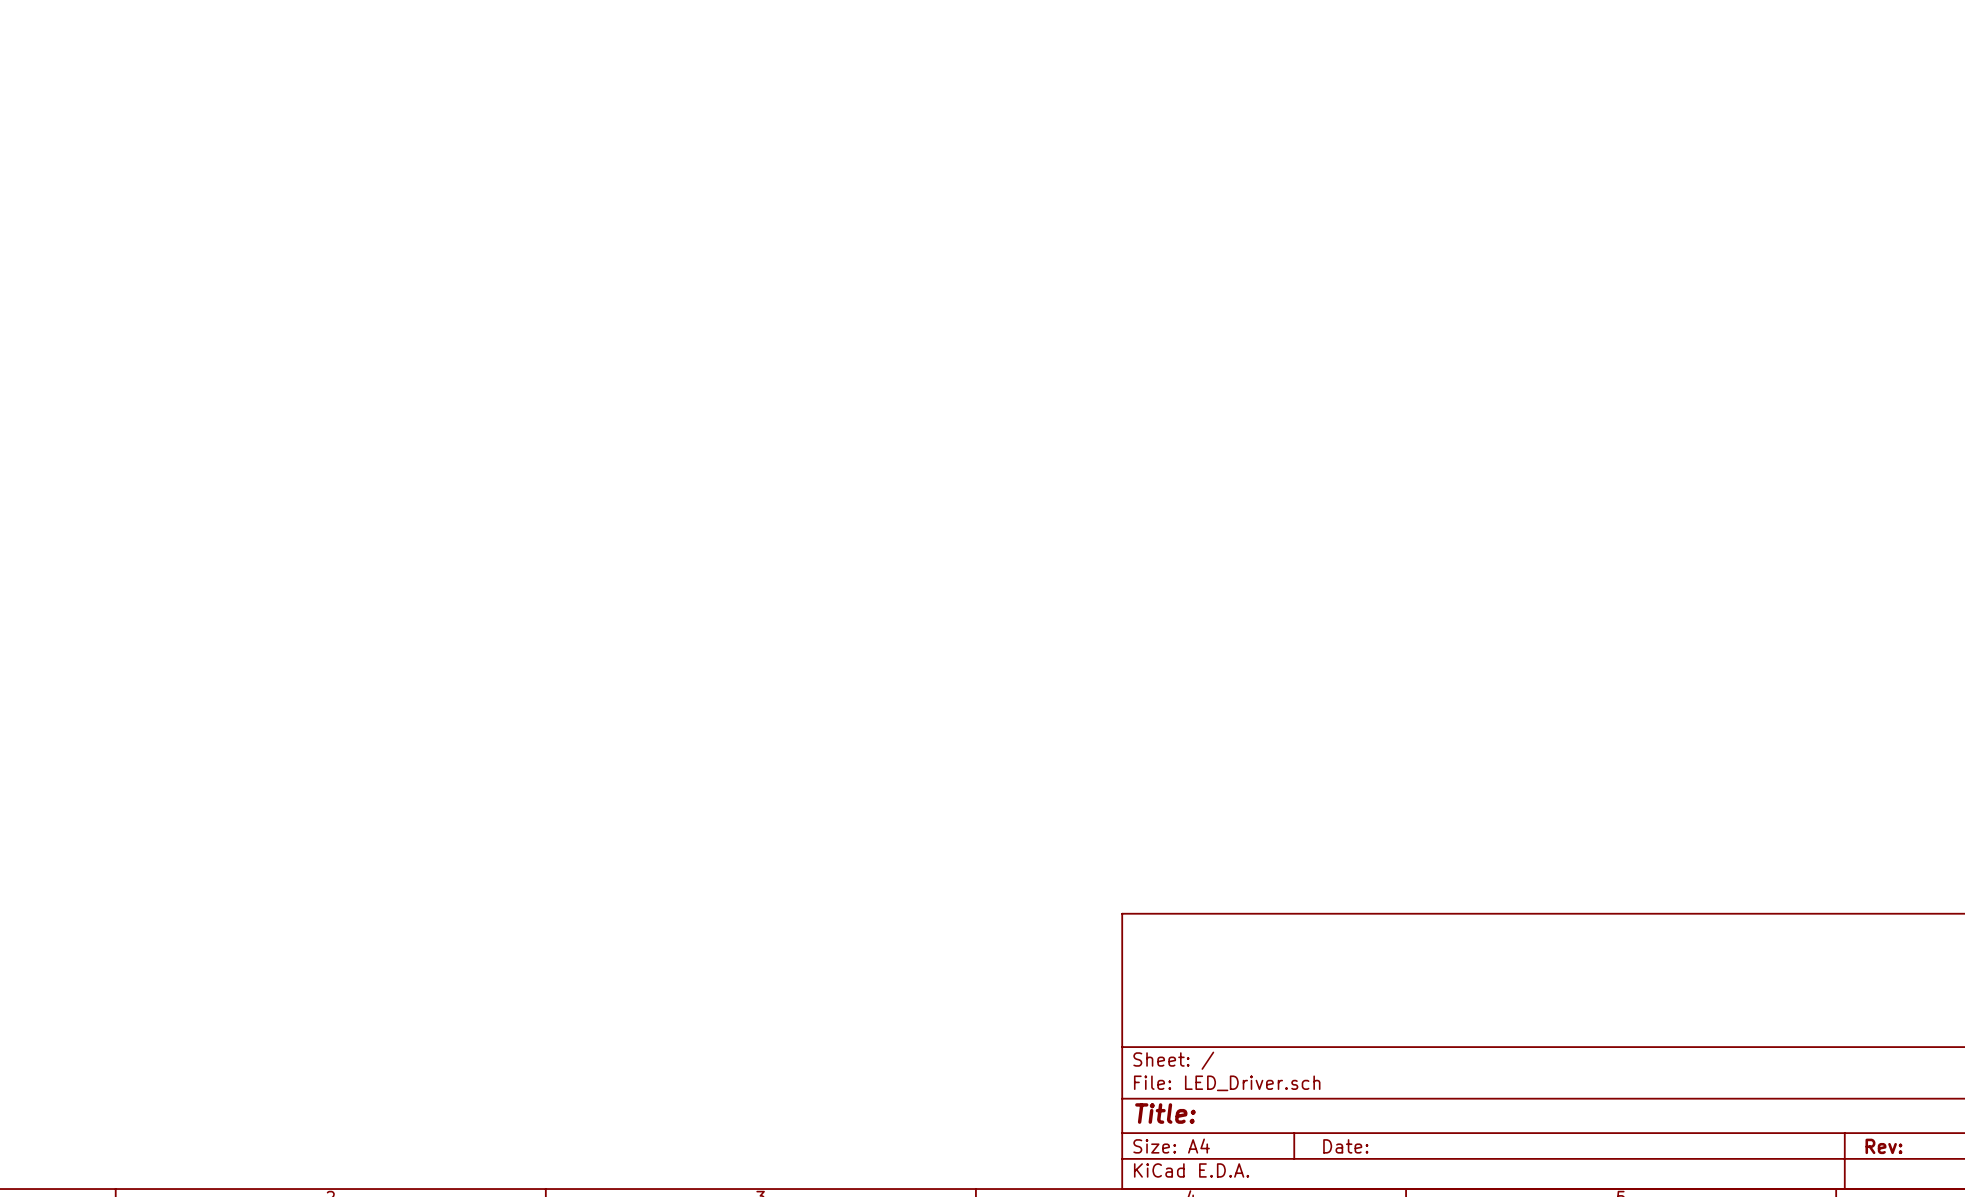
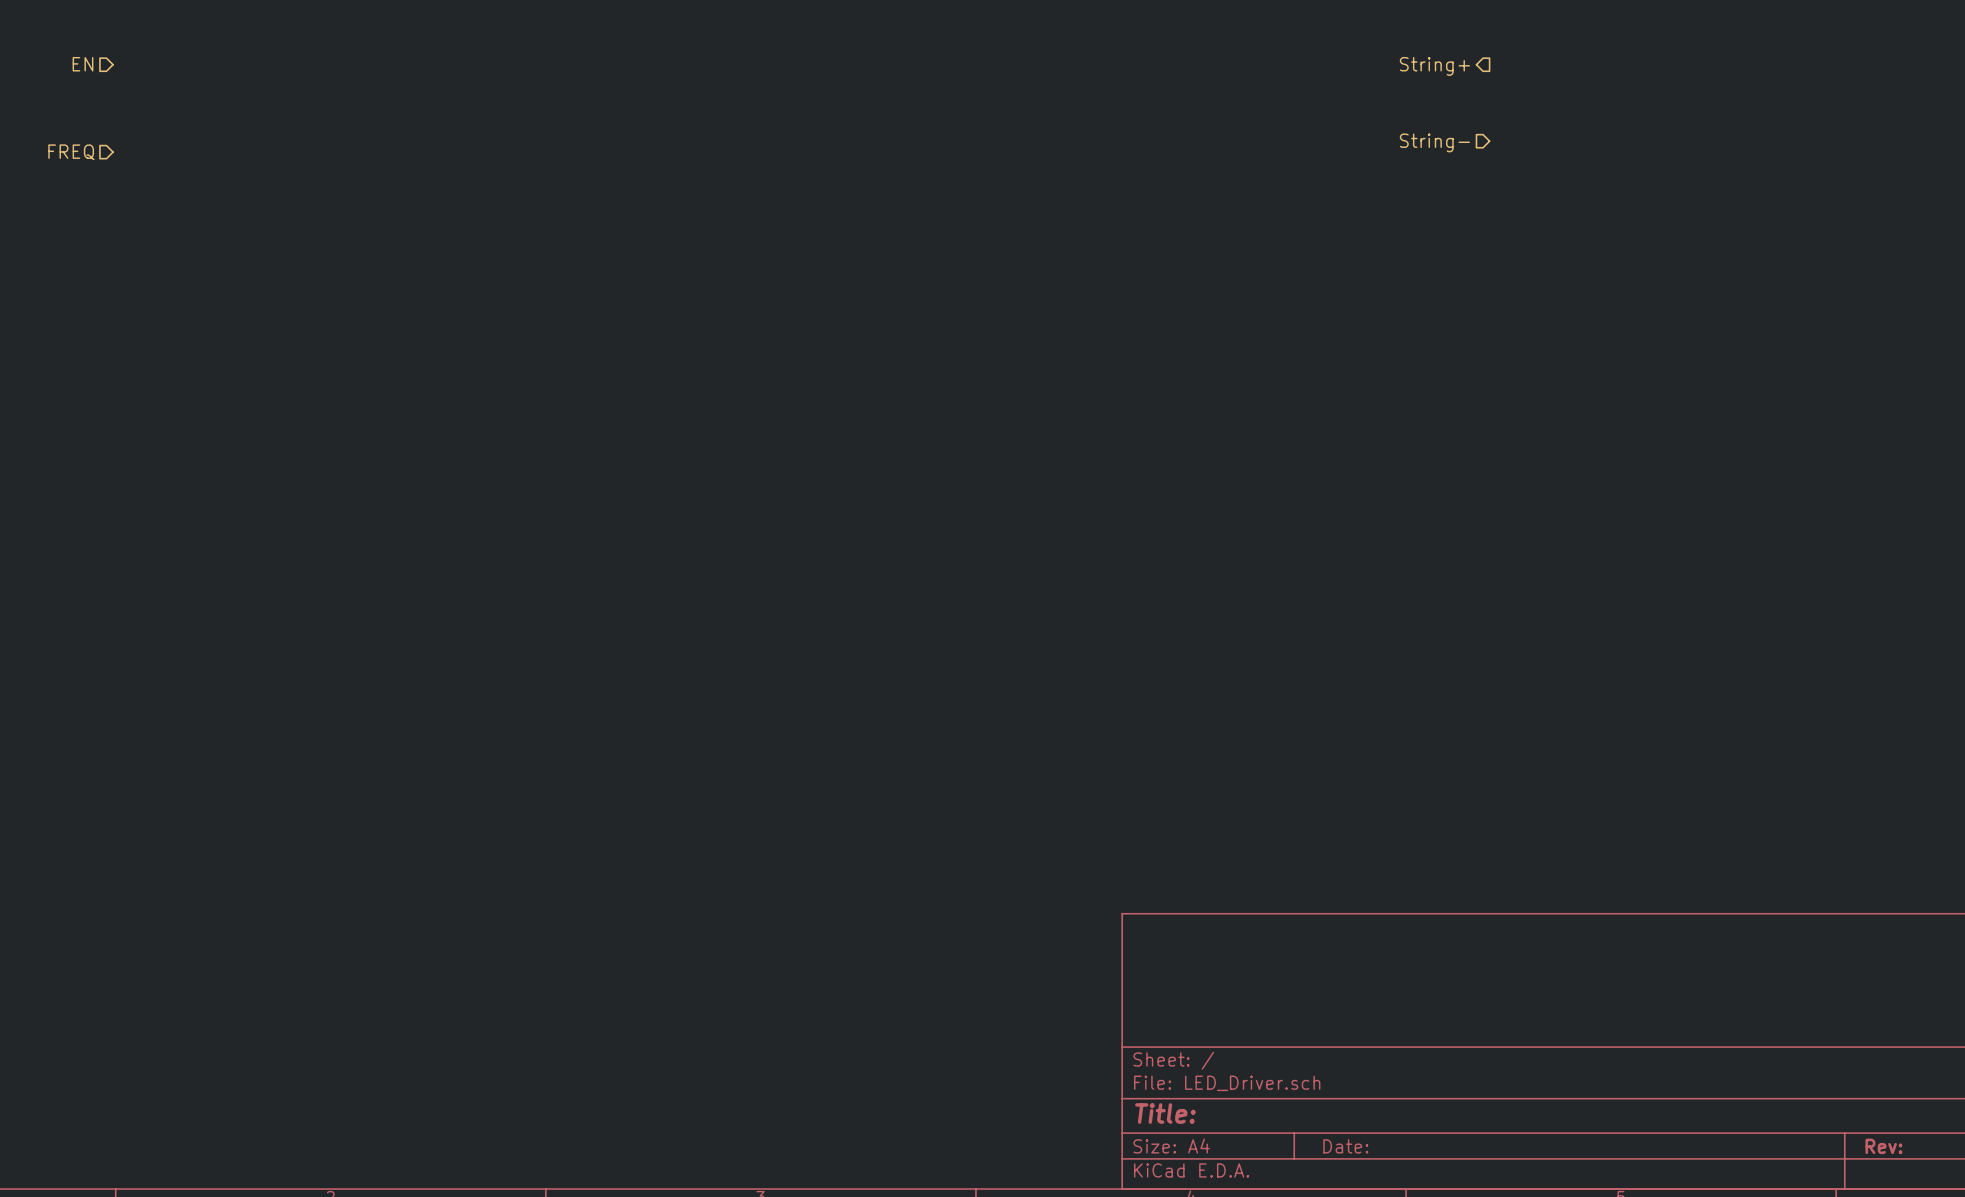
hierarchical label: none -> EN (83, 64)
hierarchical label: none -> String+ (1434, 66)
hierarchical label: none -> String- (1434, 142)
hierarchical label: none -> FREQ (71, 152)

